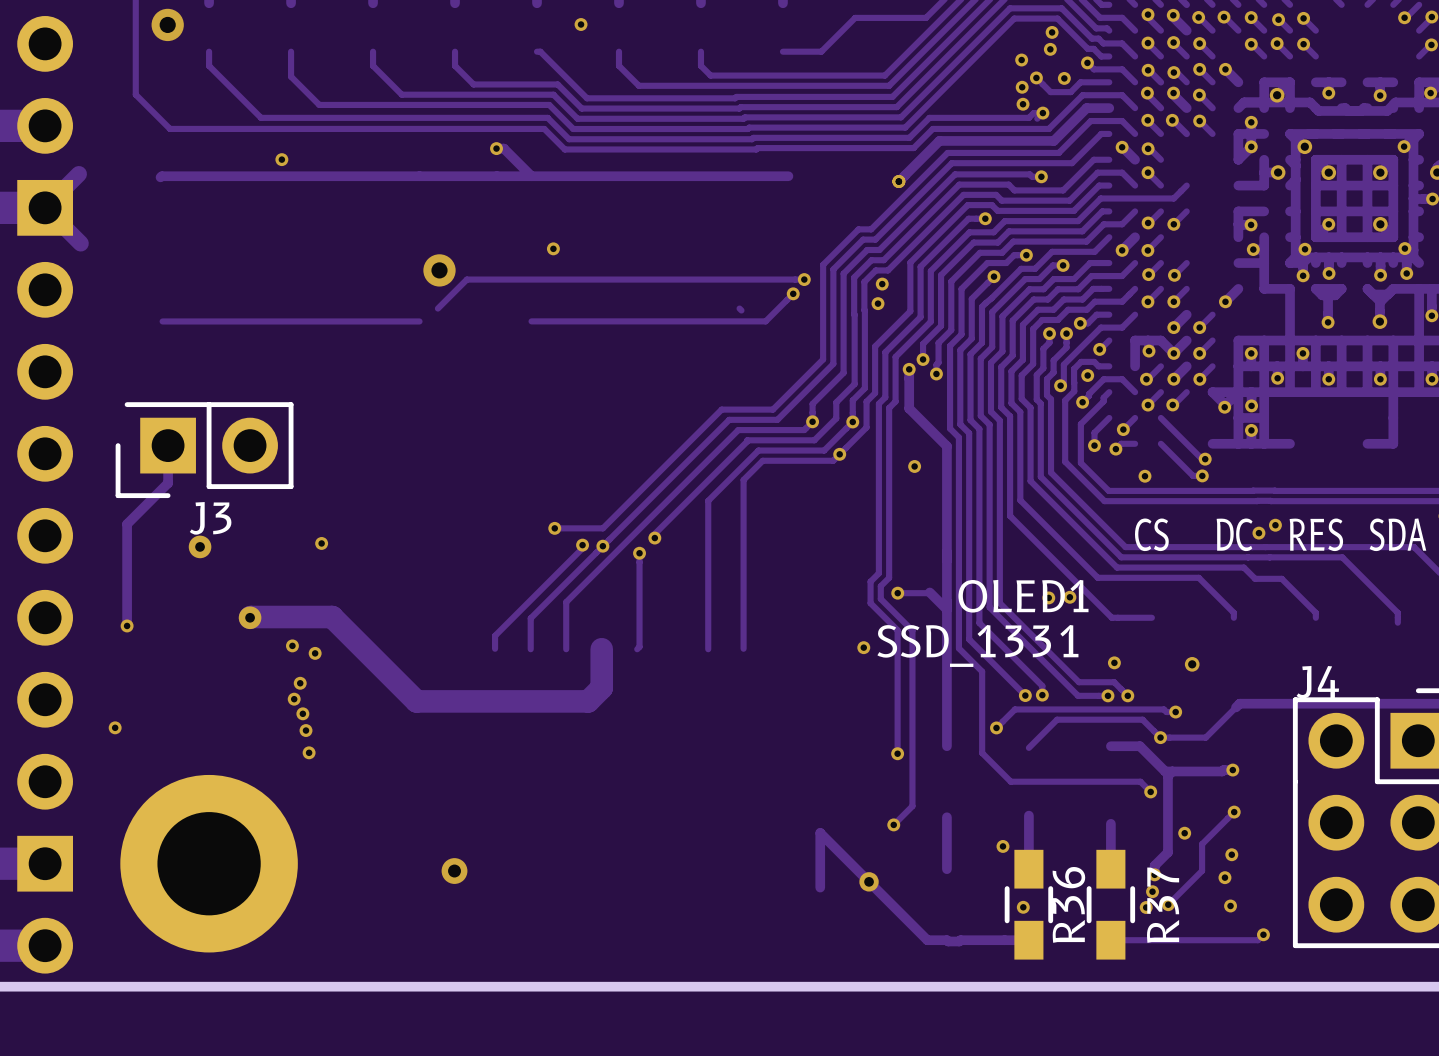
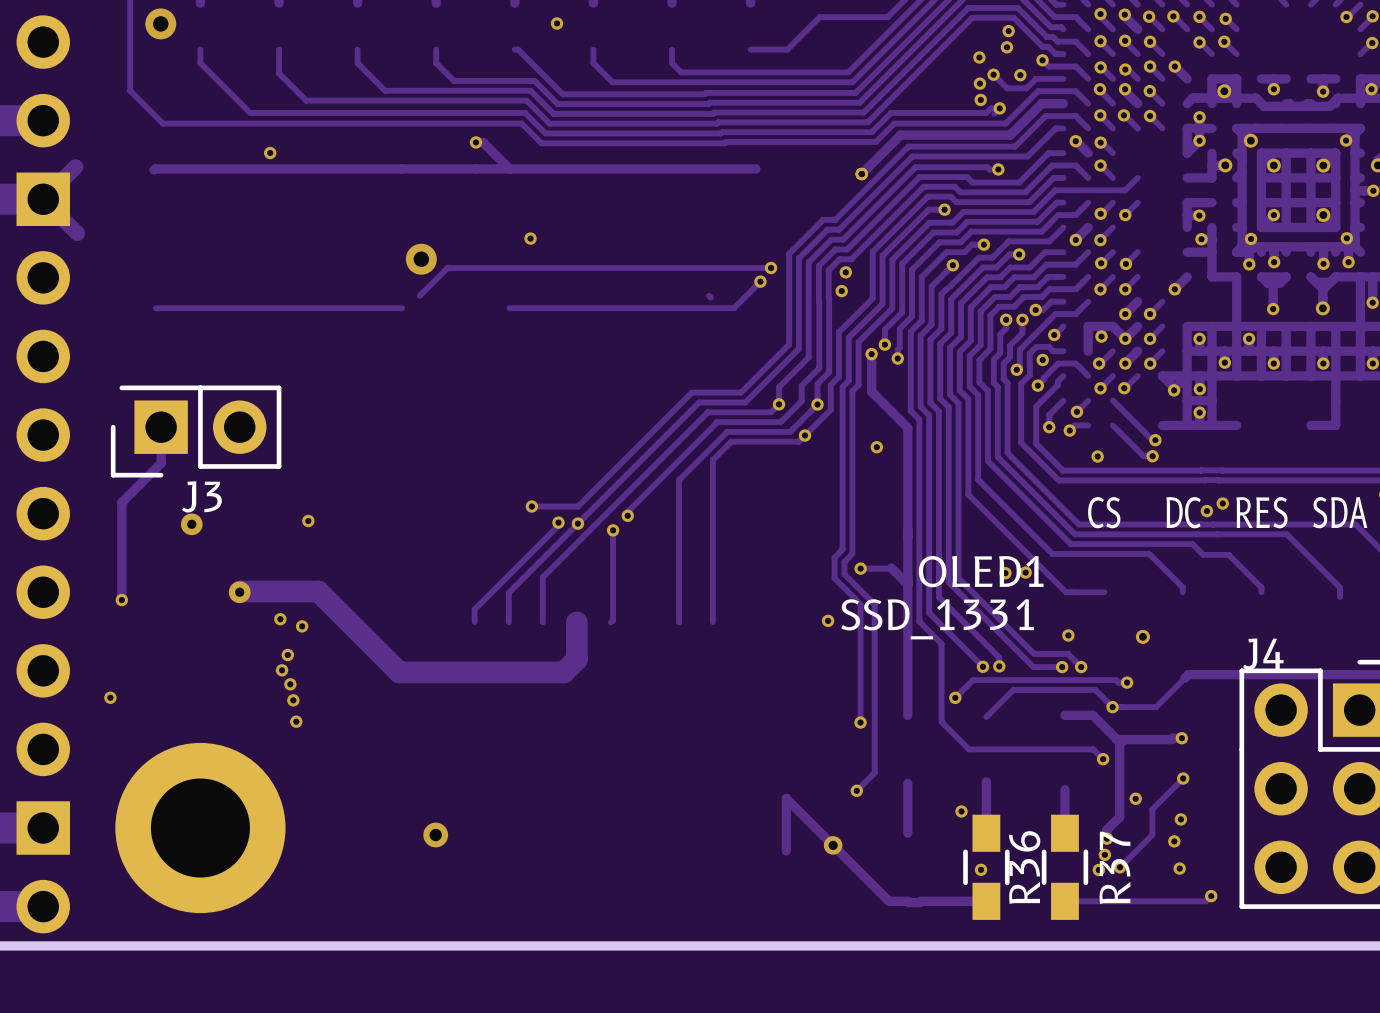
track: (1303, 18) (1315, 30) -> none
via: (1303, 18) -> none
track: (1303, 44) (1315, 56) -> none
via: (1303, 44) -> none

